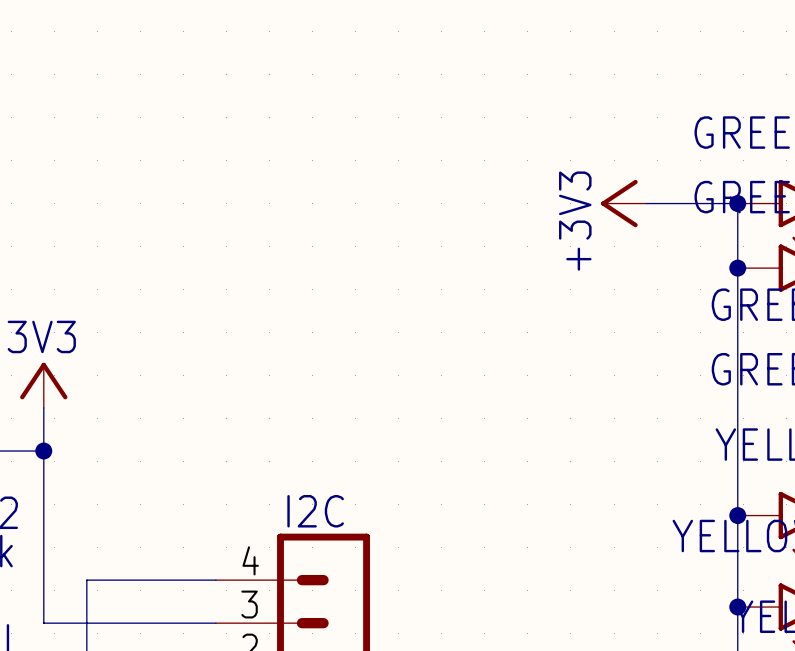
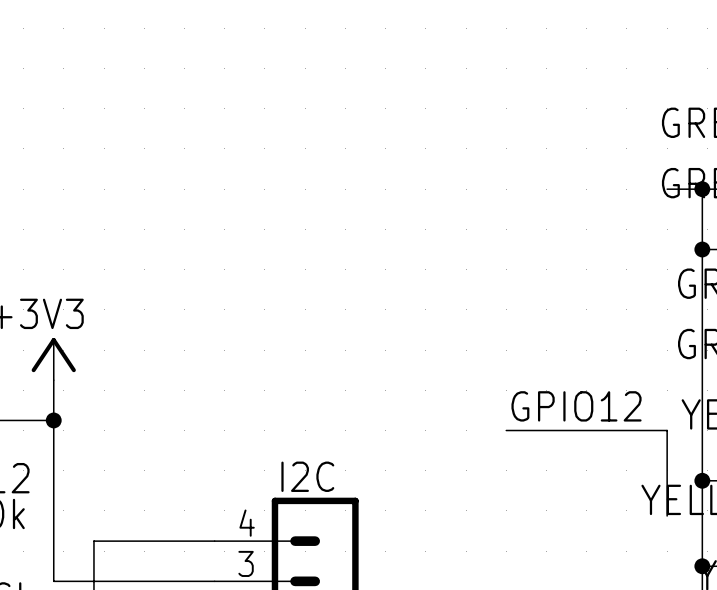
power symbol: +3V3 (623, 203) -> none
wire: (646, 203) (700, 203) -> none
label: none -> GPIO12 (576, 406)
wire: none -> (506, 430) (667, 430) (667, 515)

